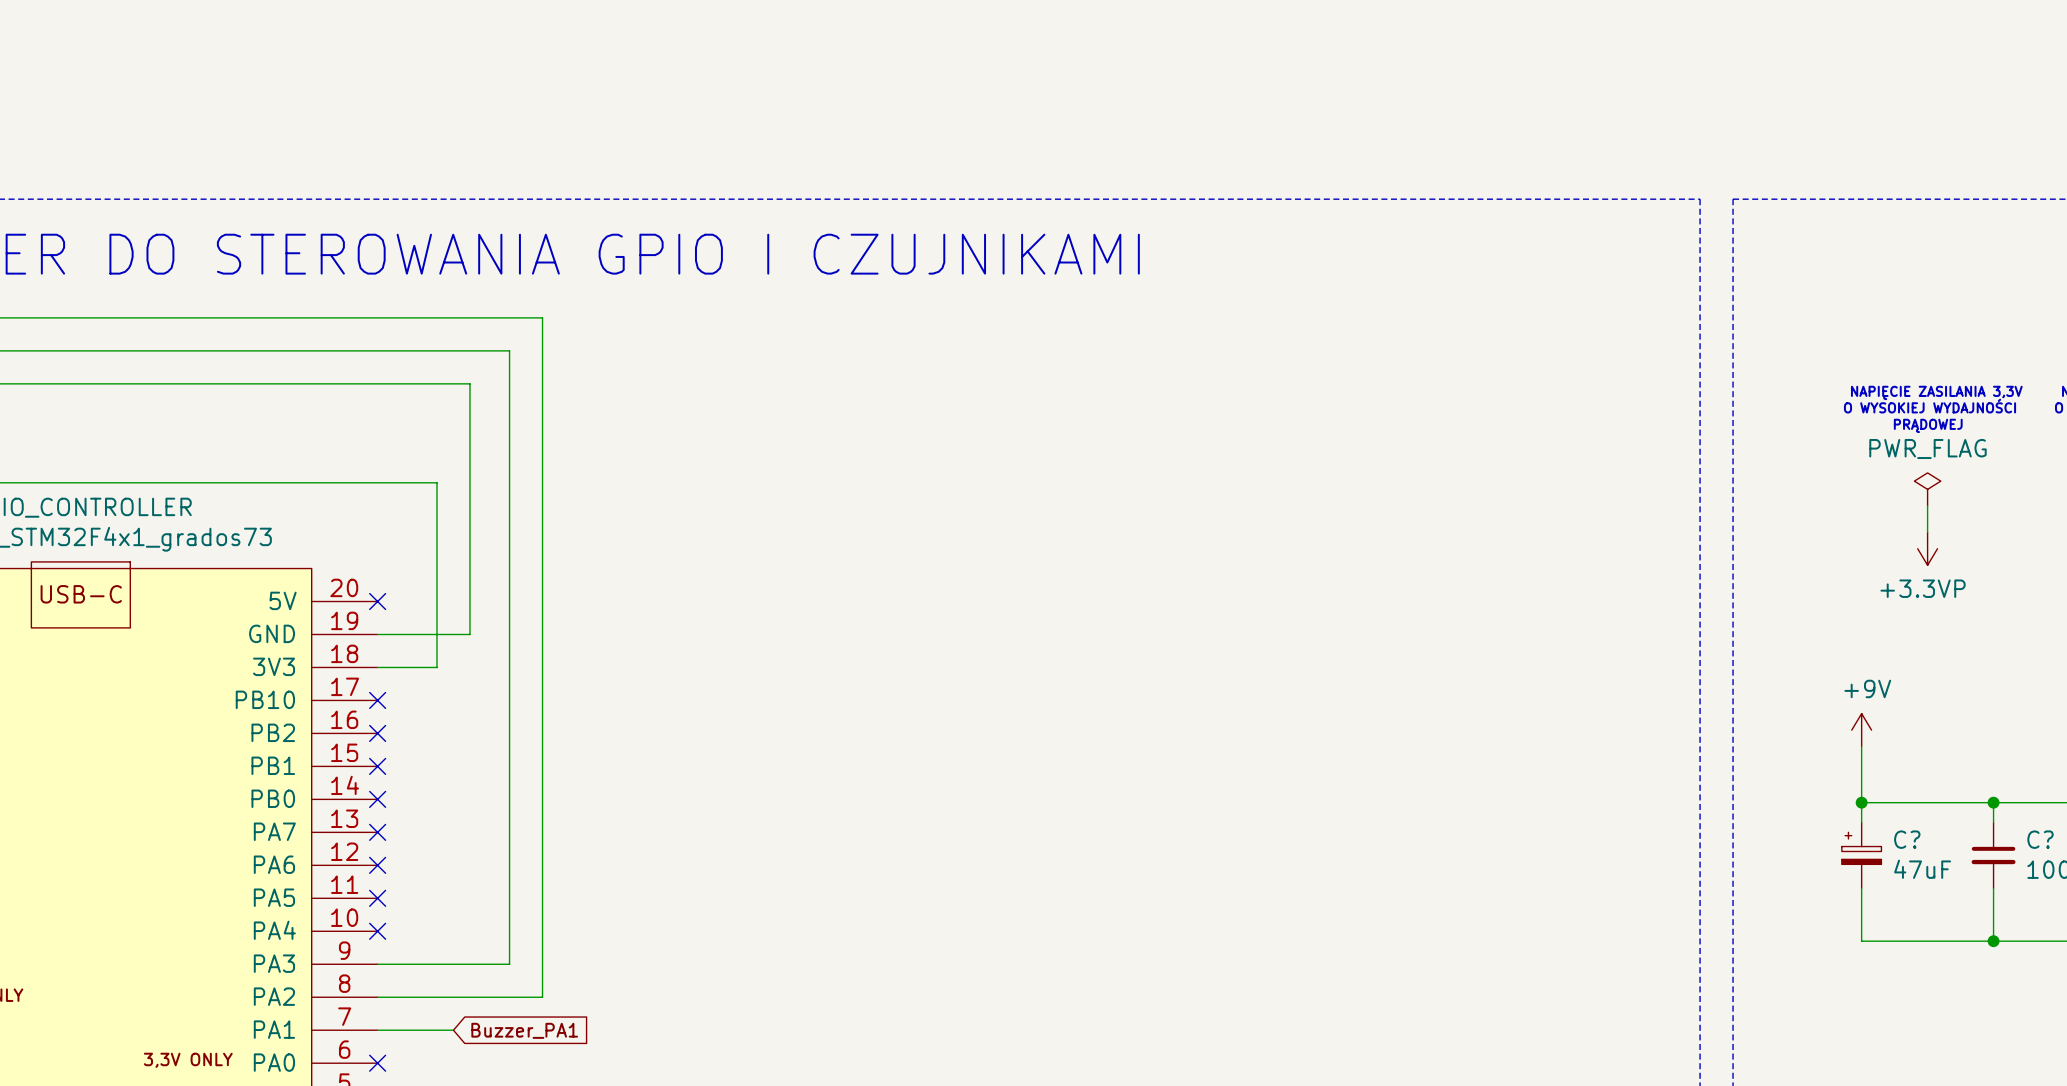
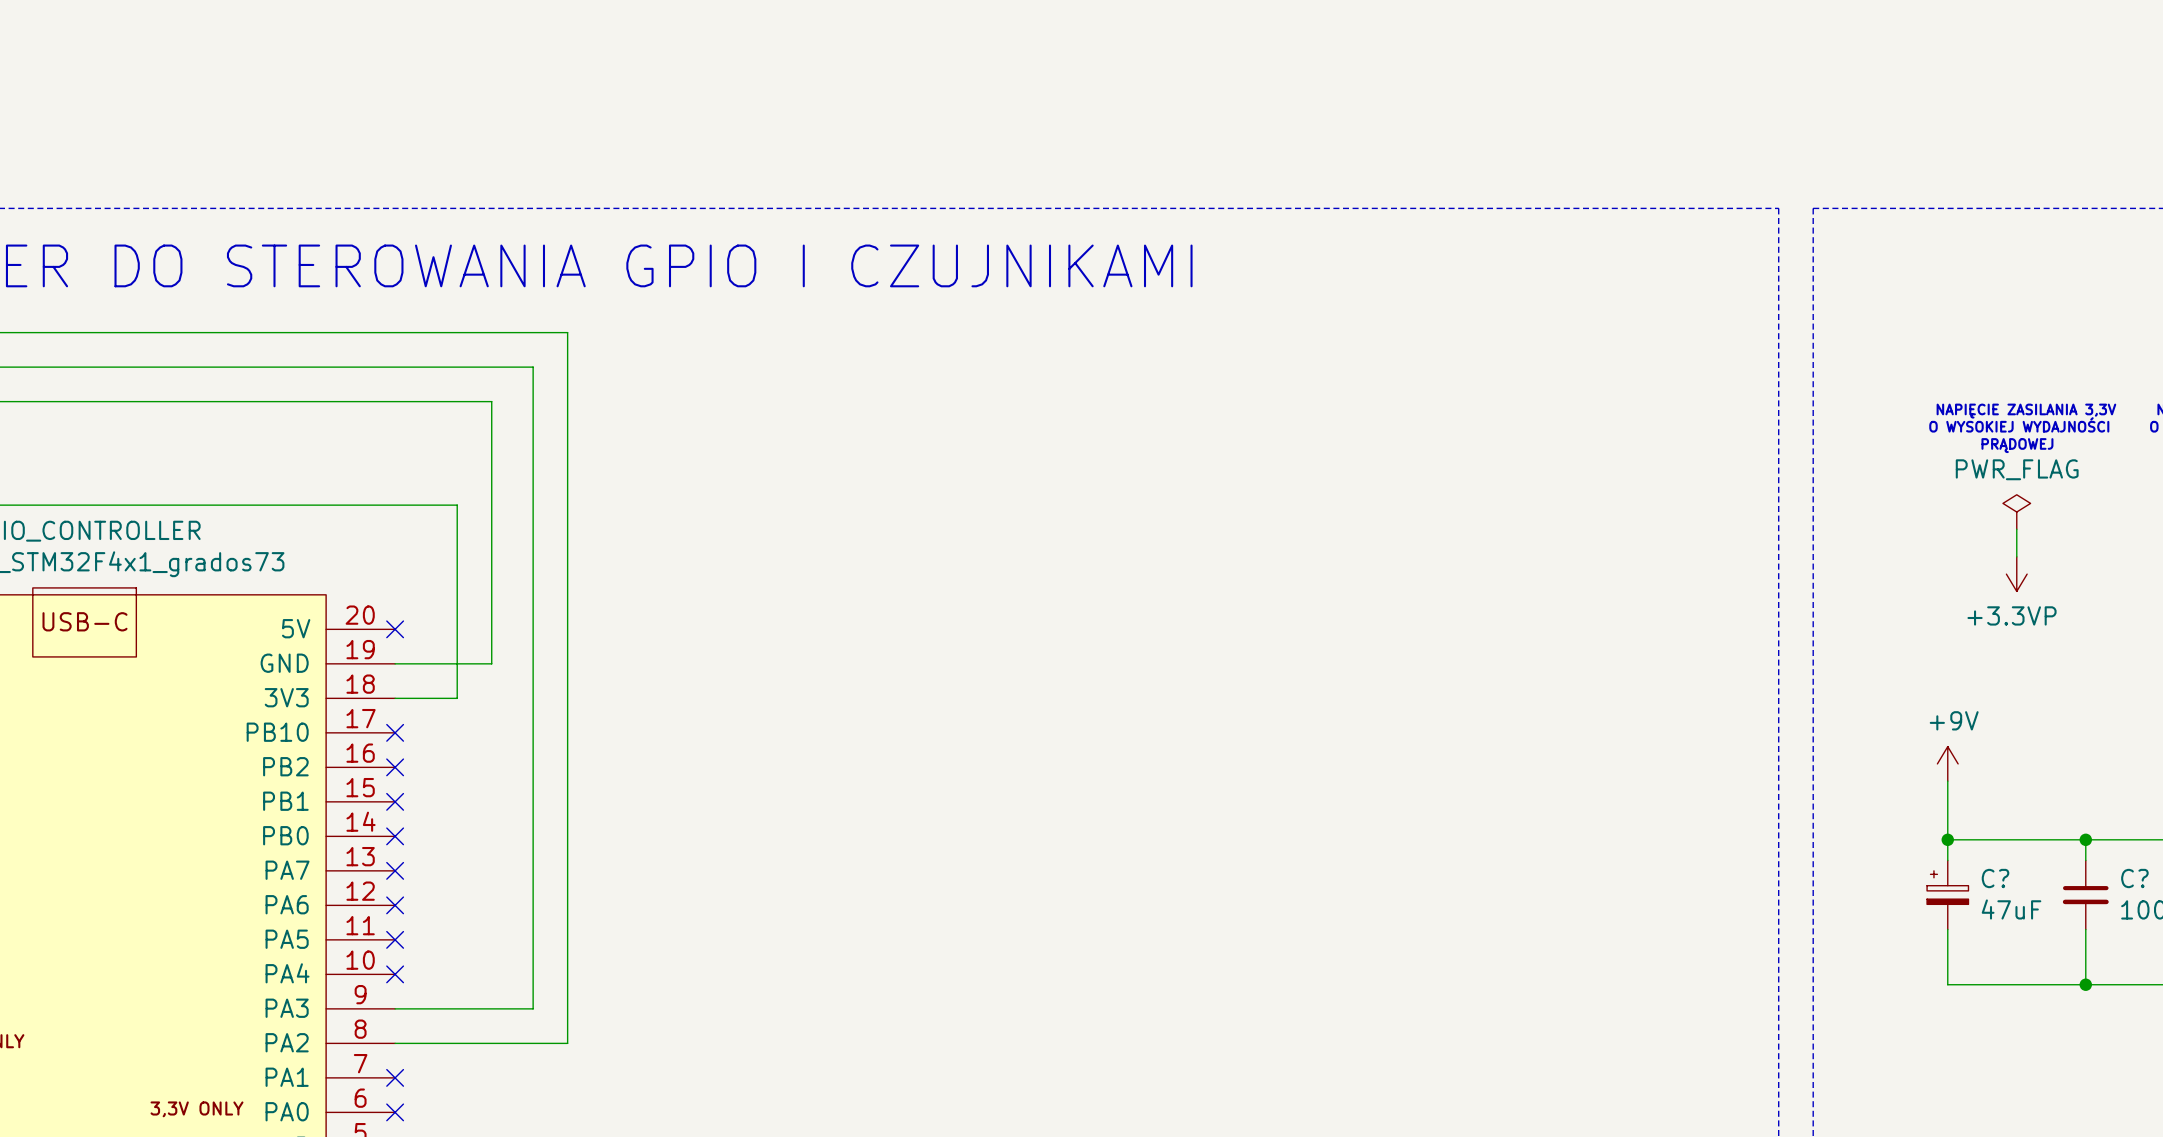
wire: (377, 1030) (453, 1030) -> none
no-connect mark: none -> (395, 1077)
global label: Buzzer_PA1 (524, 1030) -> none

